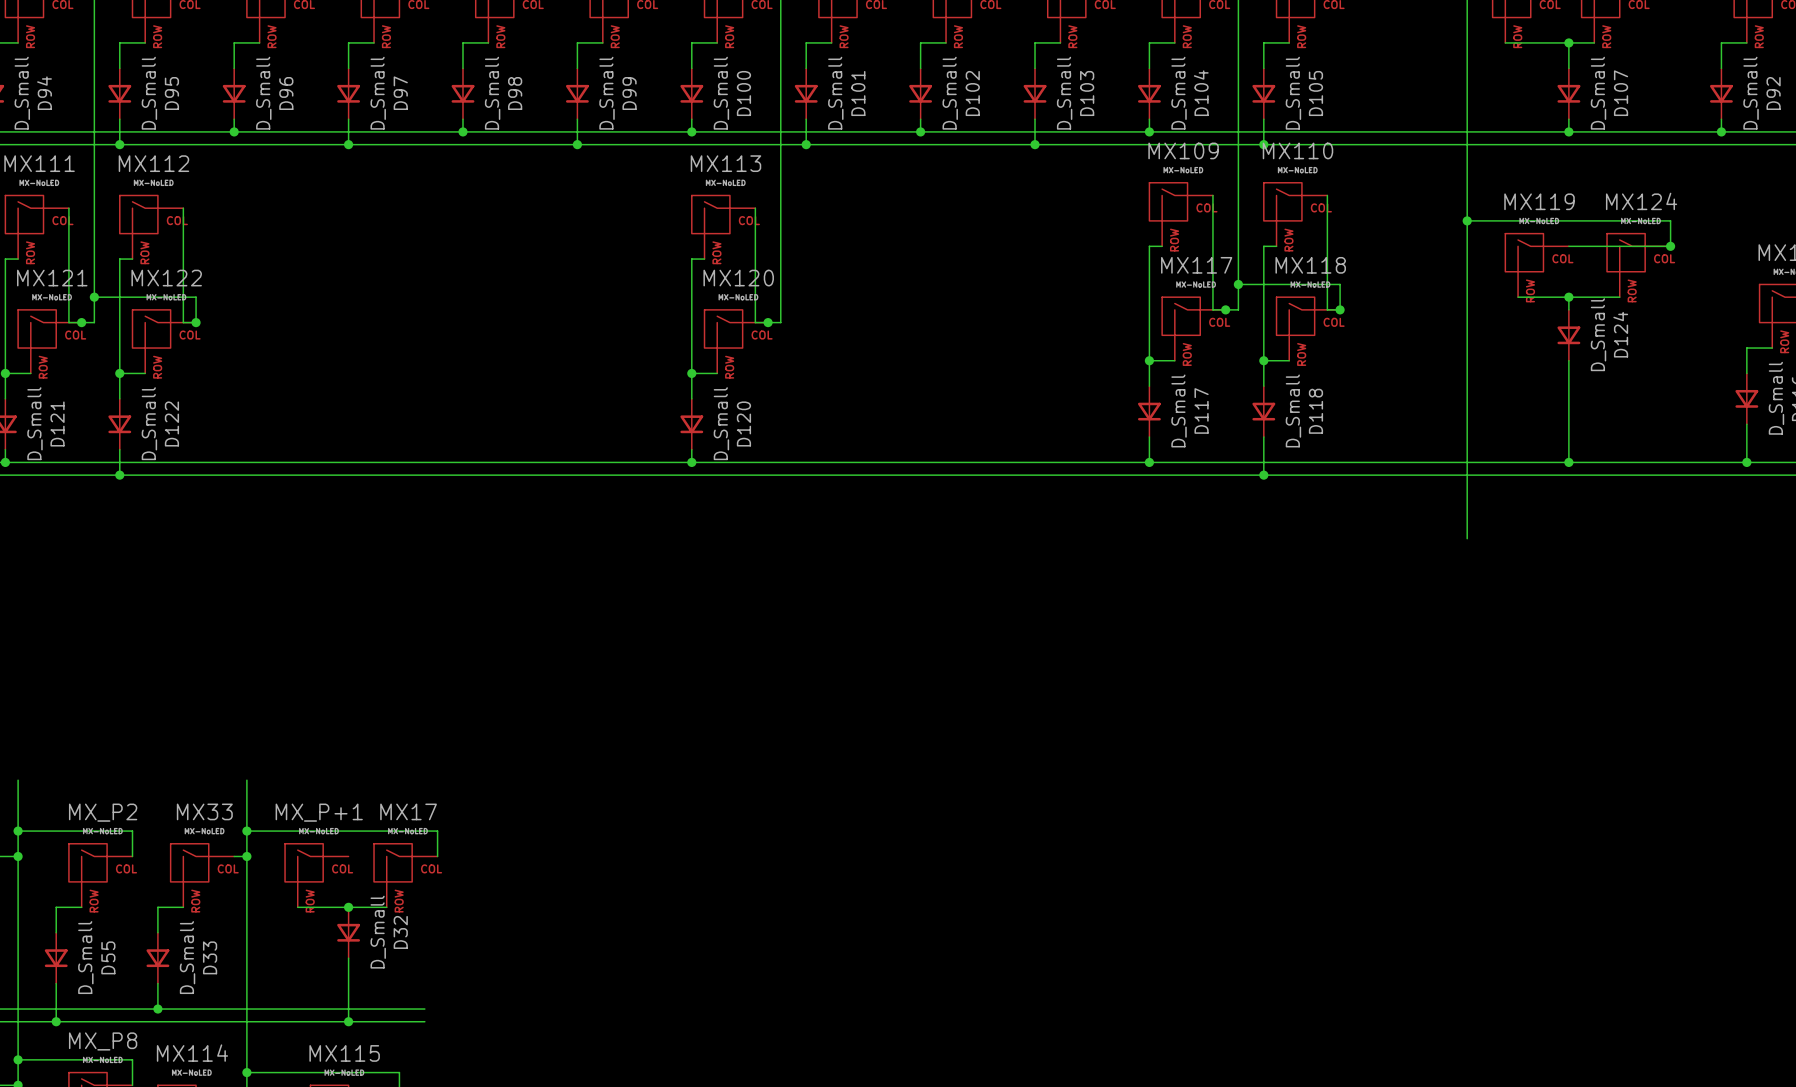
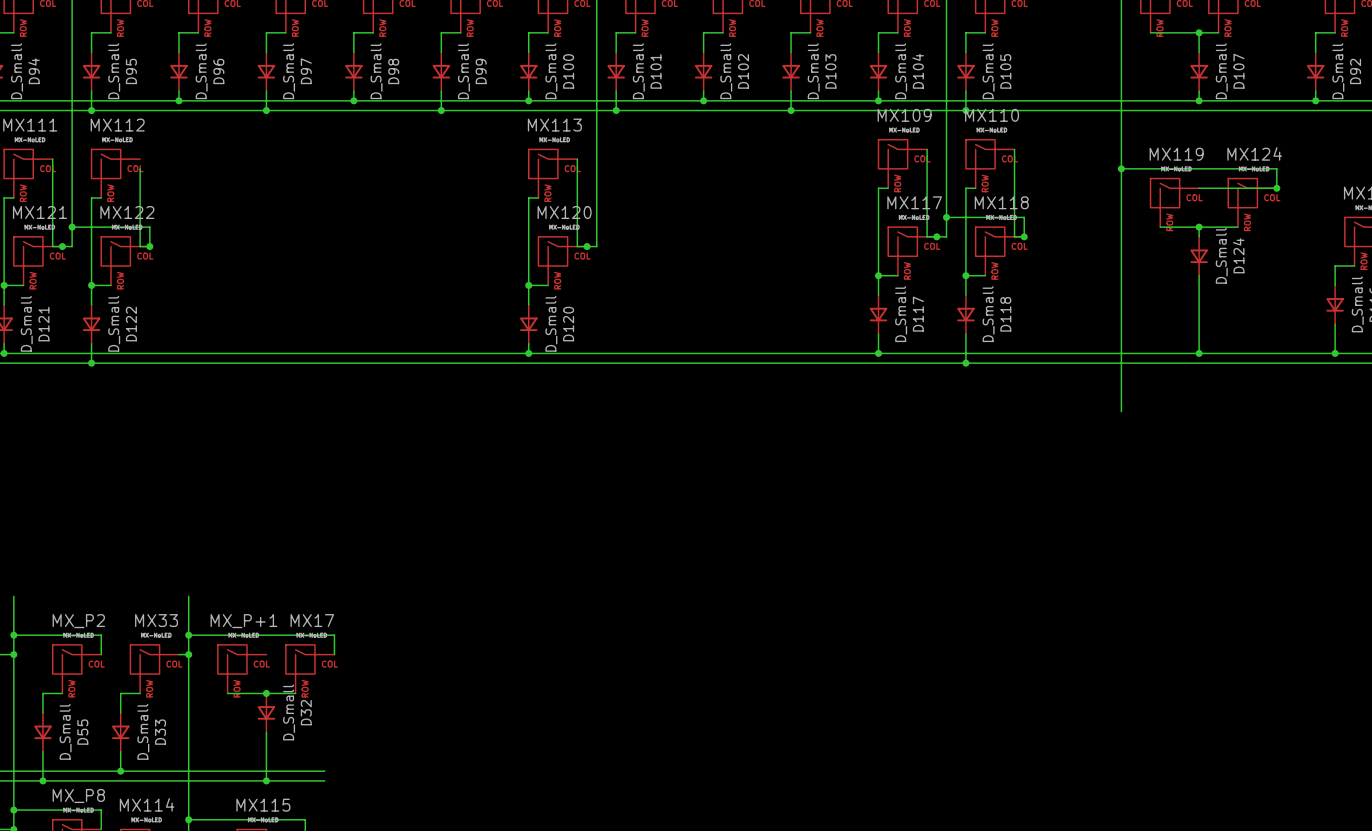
wire: (183, 208) (183, 220) -> none

